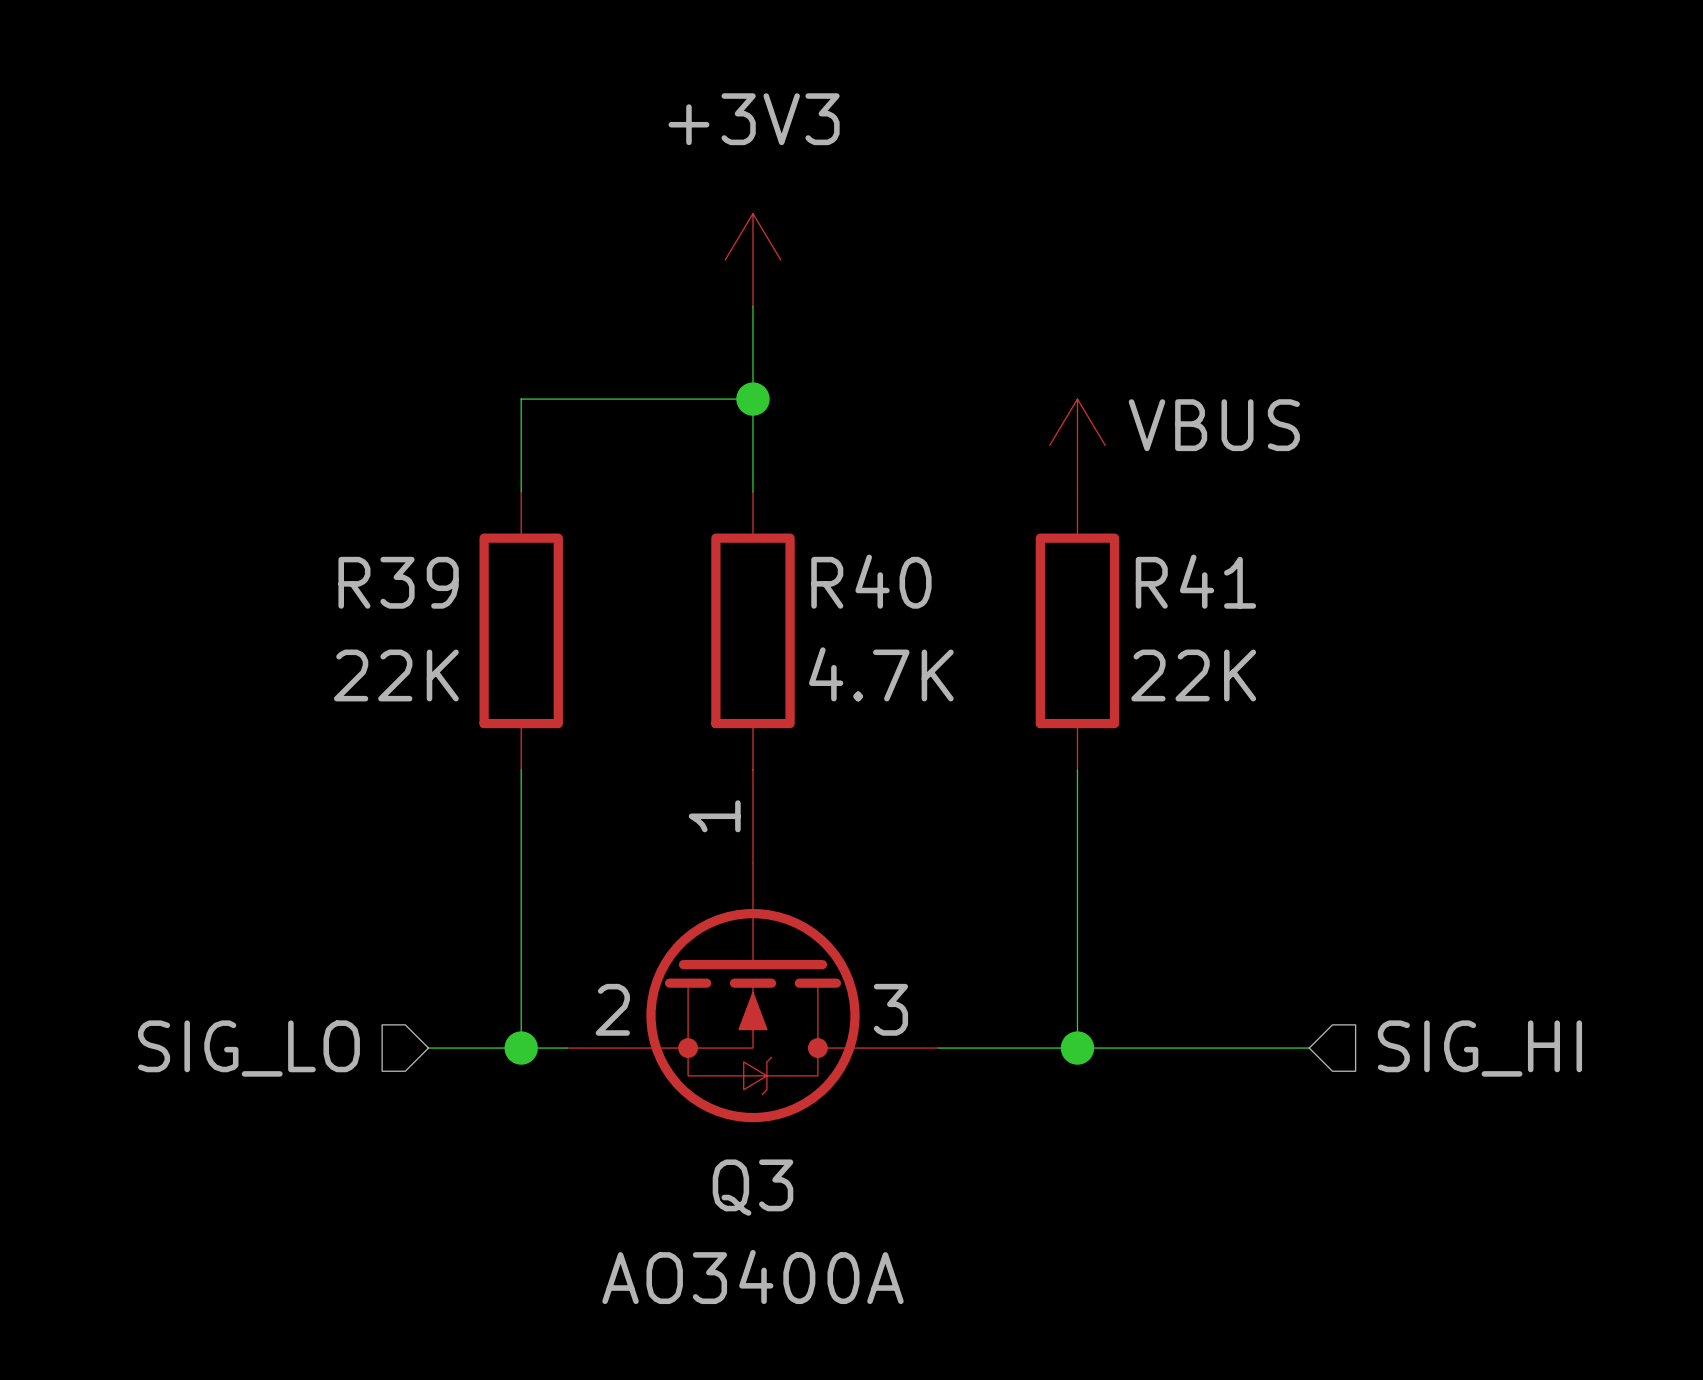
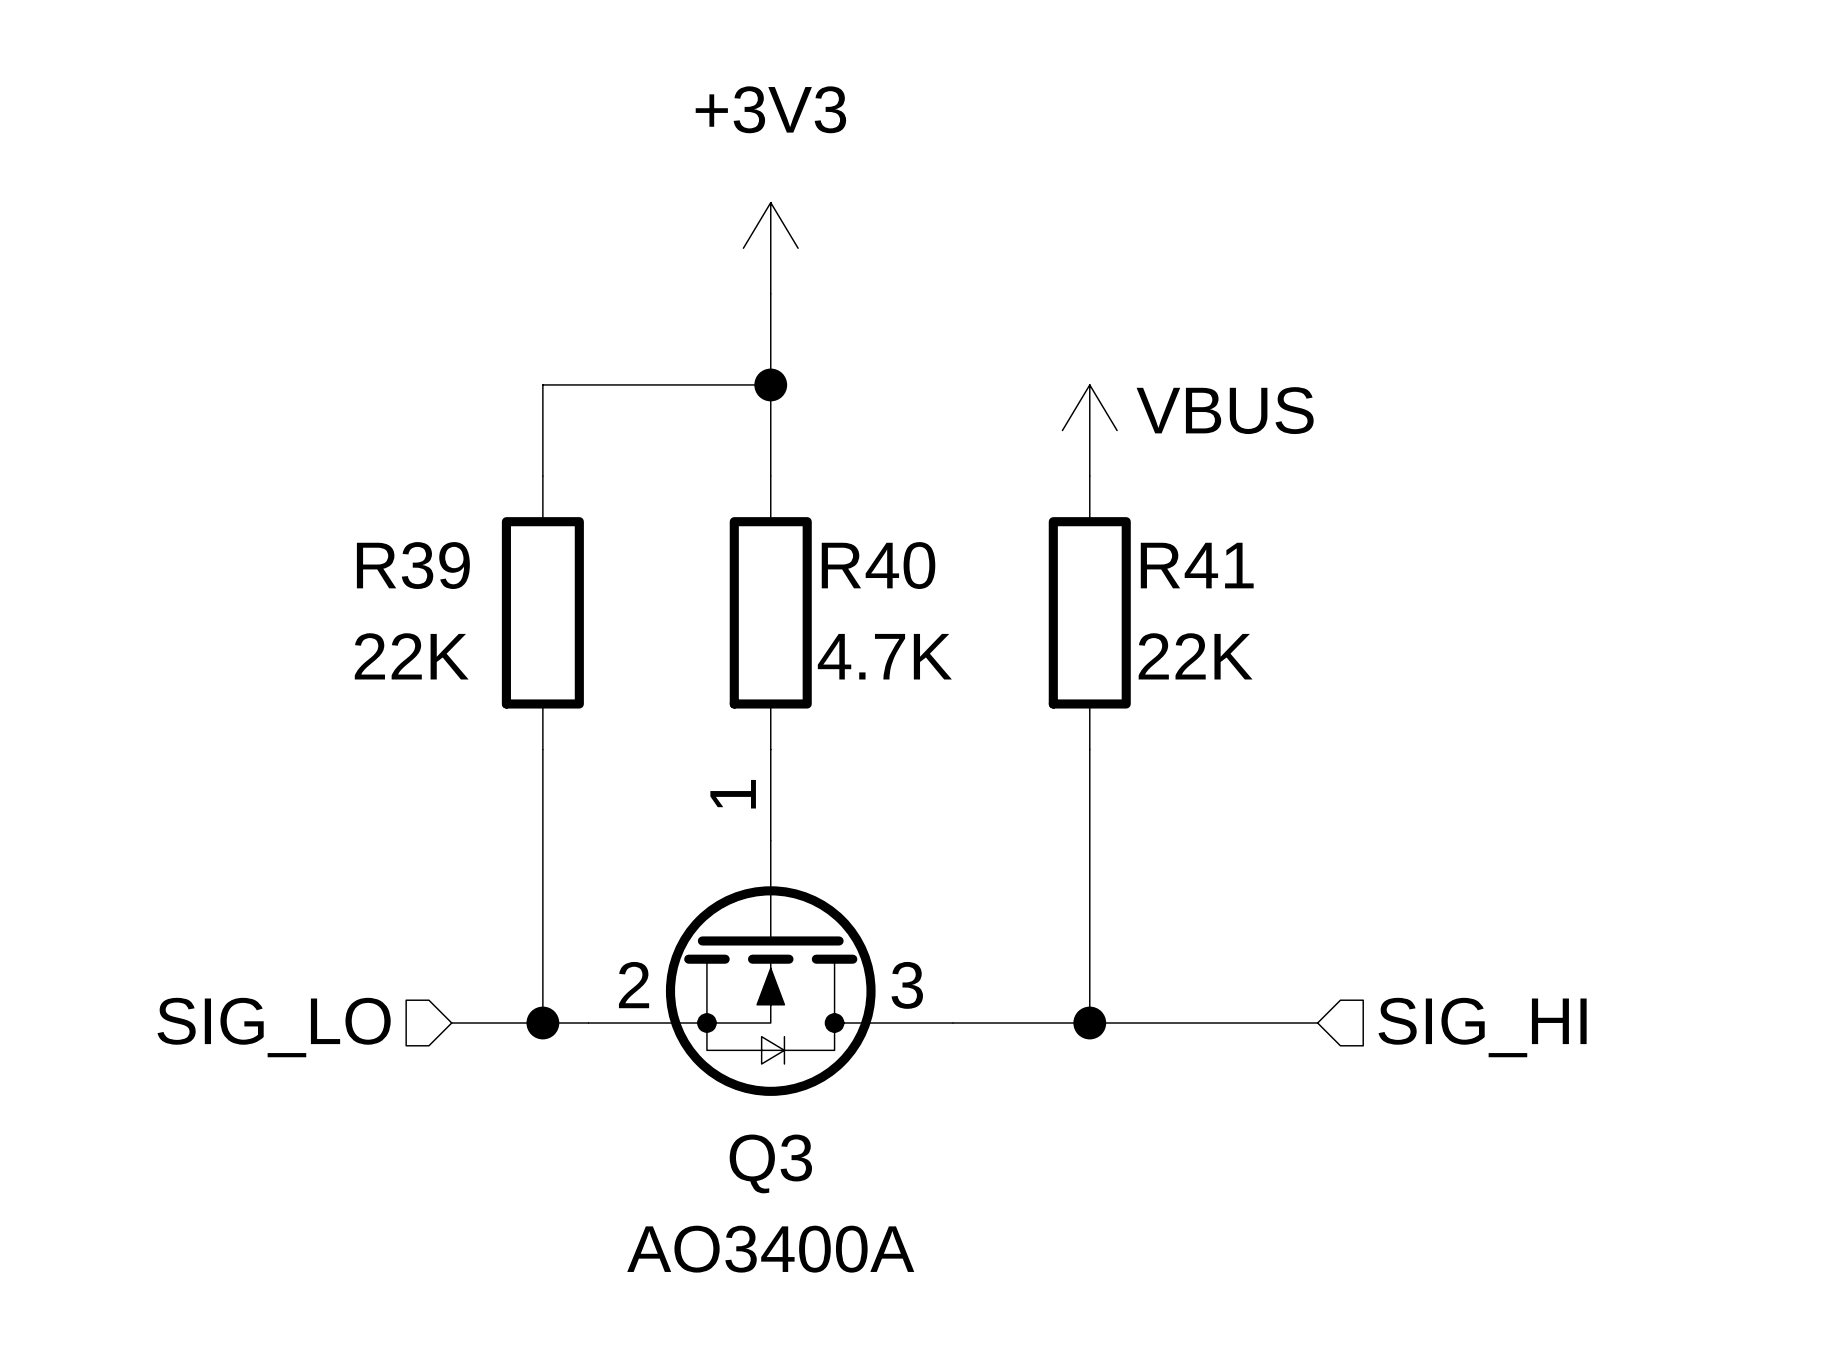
Q3 symbol: [567, 769, 939, 1123] -> [588, 749, 954, 1096]

